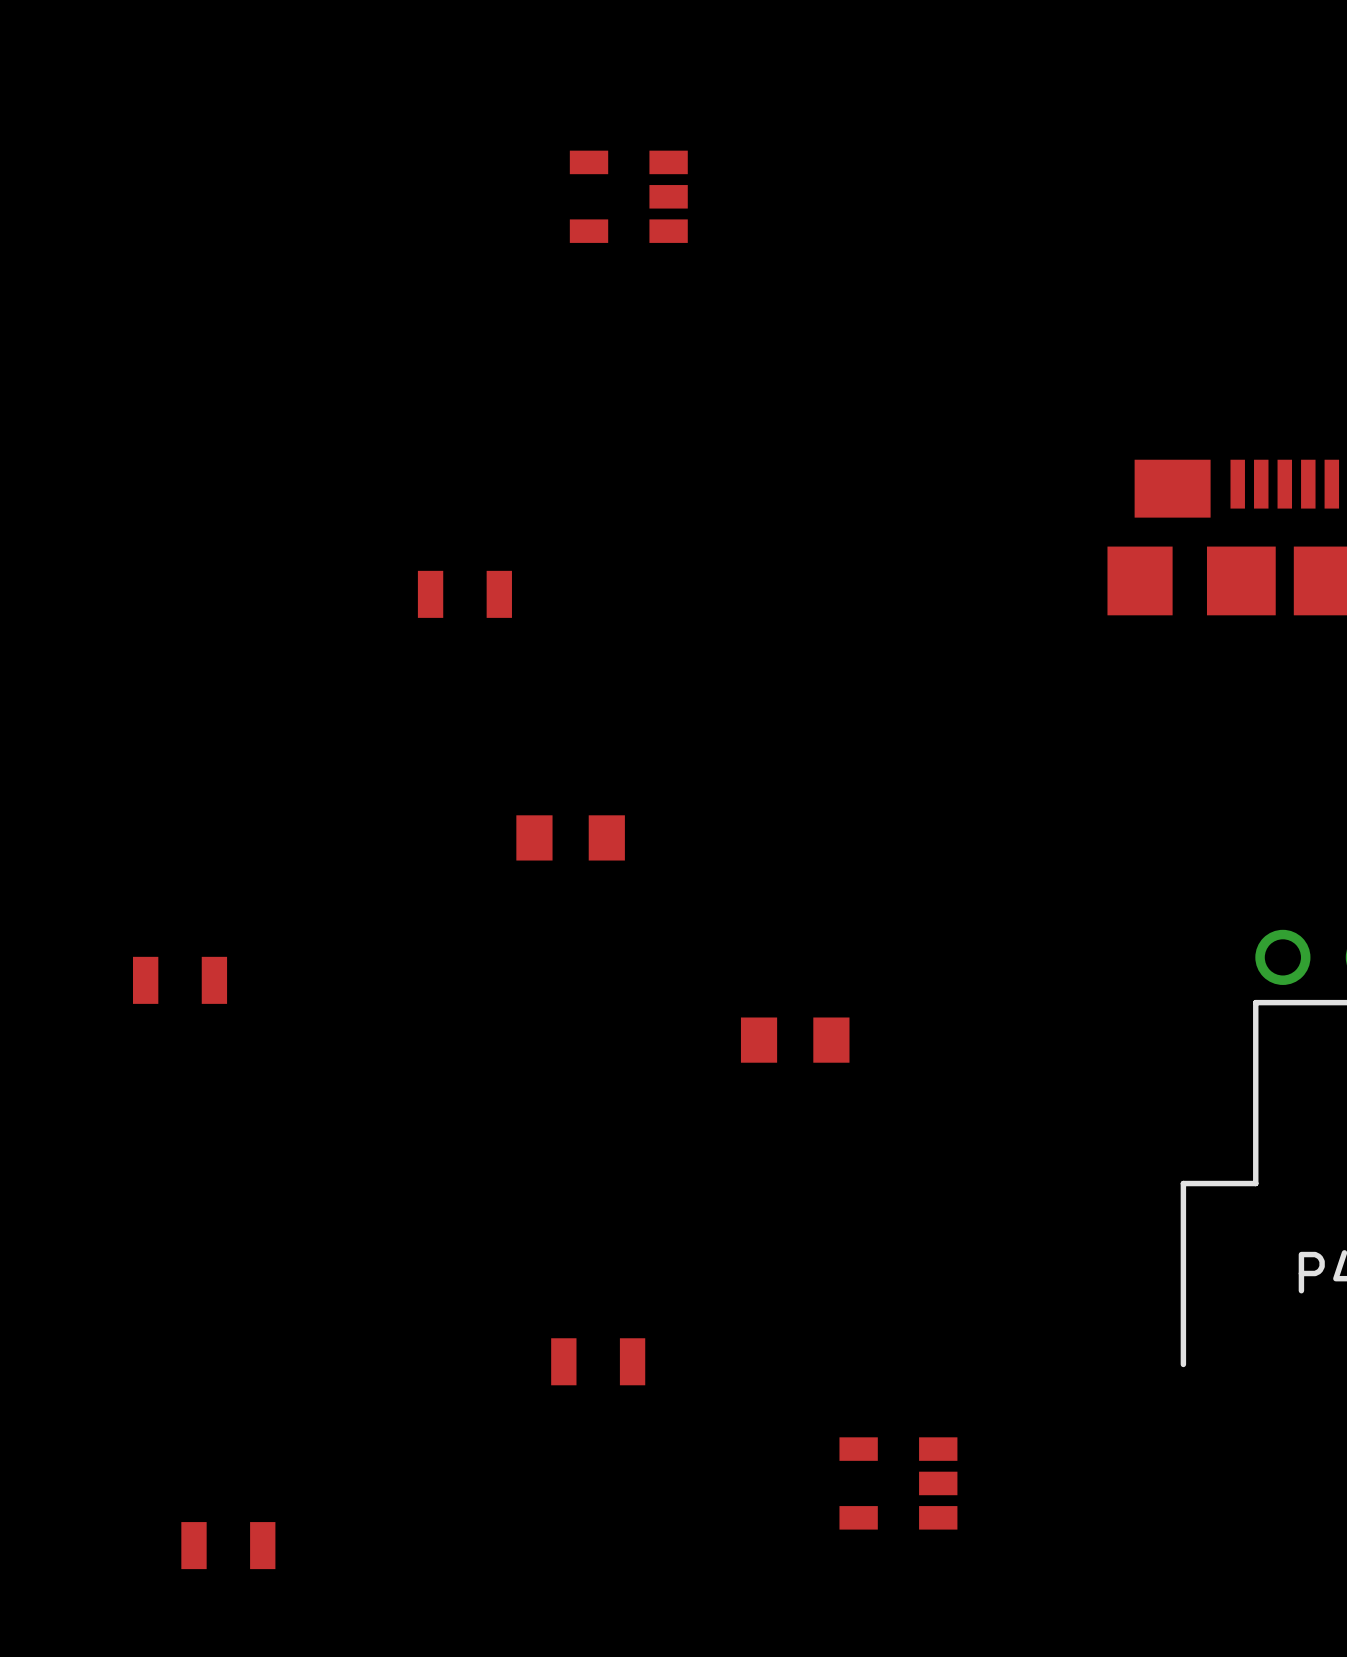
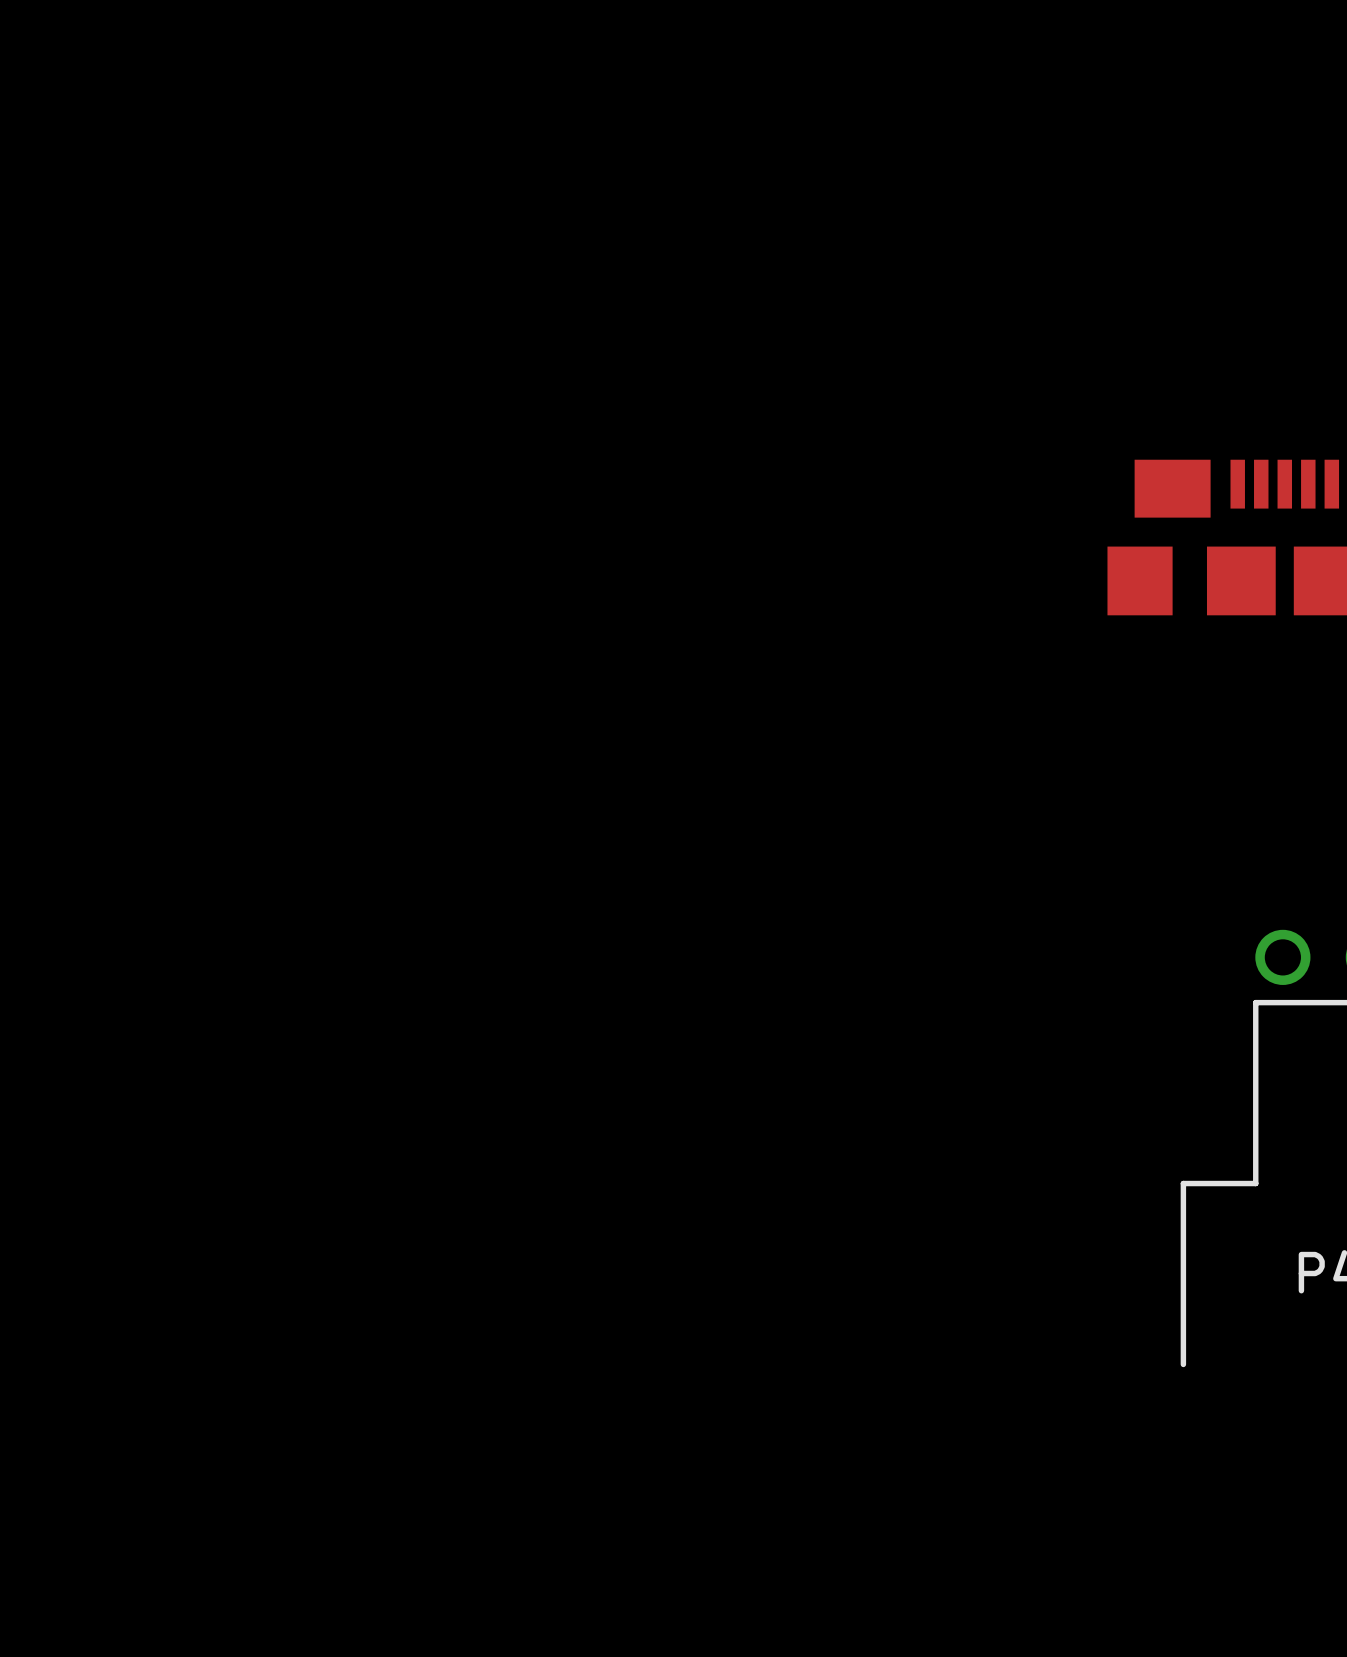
part: (628, 196) -> none
part: (464, 594) -> none
part: (570, 837) -> none
part: (180, 980) -> none
part: (795, 1040) -> none
part: (598, 1361) -> none
part: (898, 1483) -> none
part: (228, 1545) -> none

